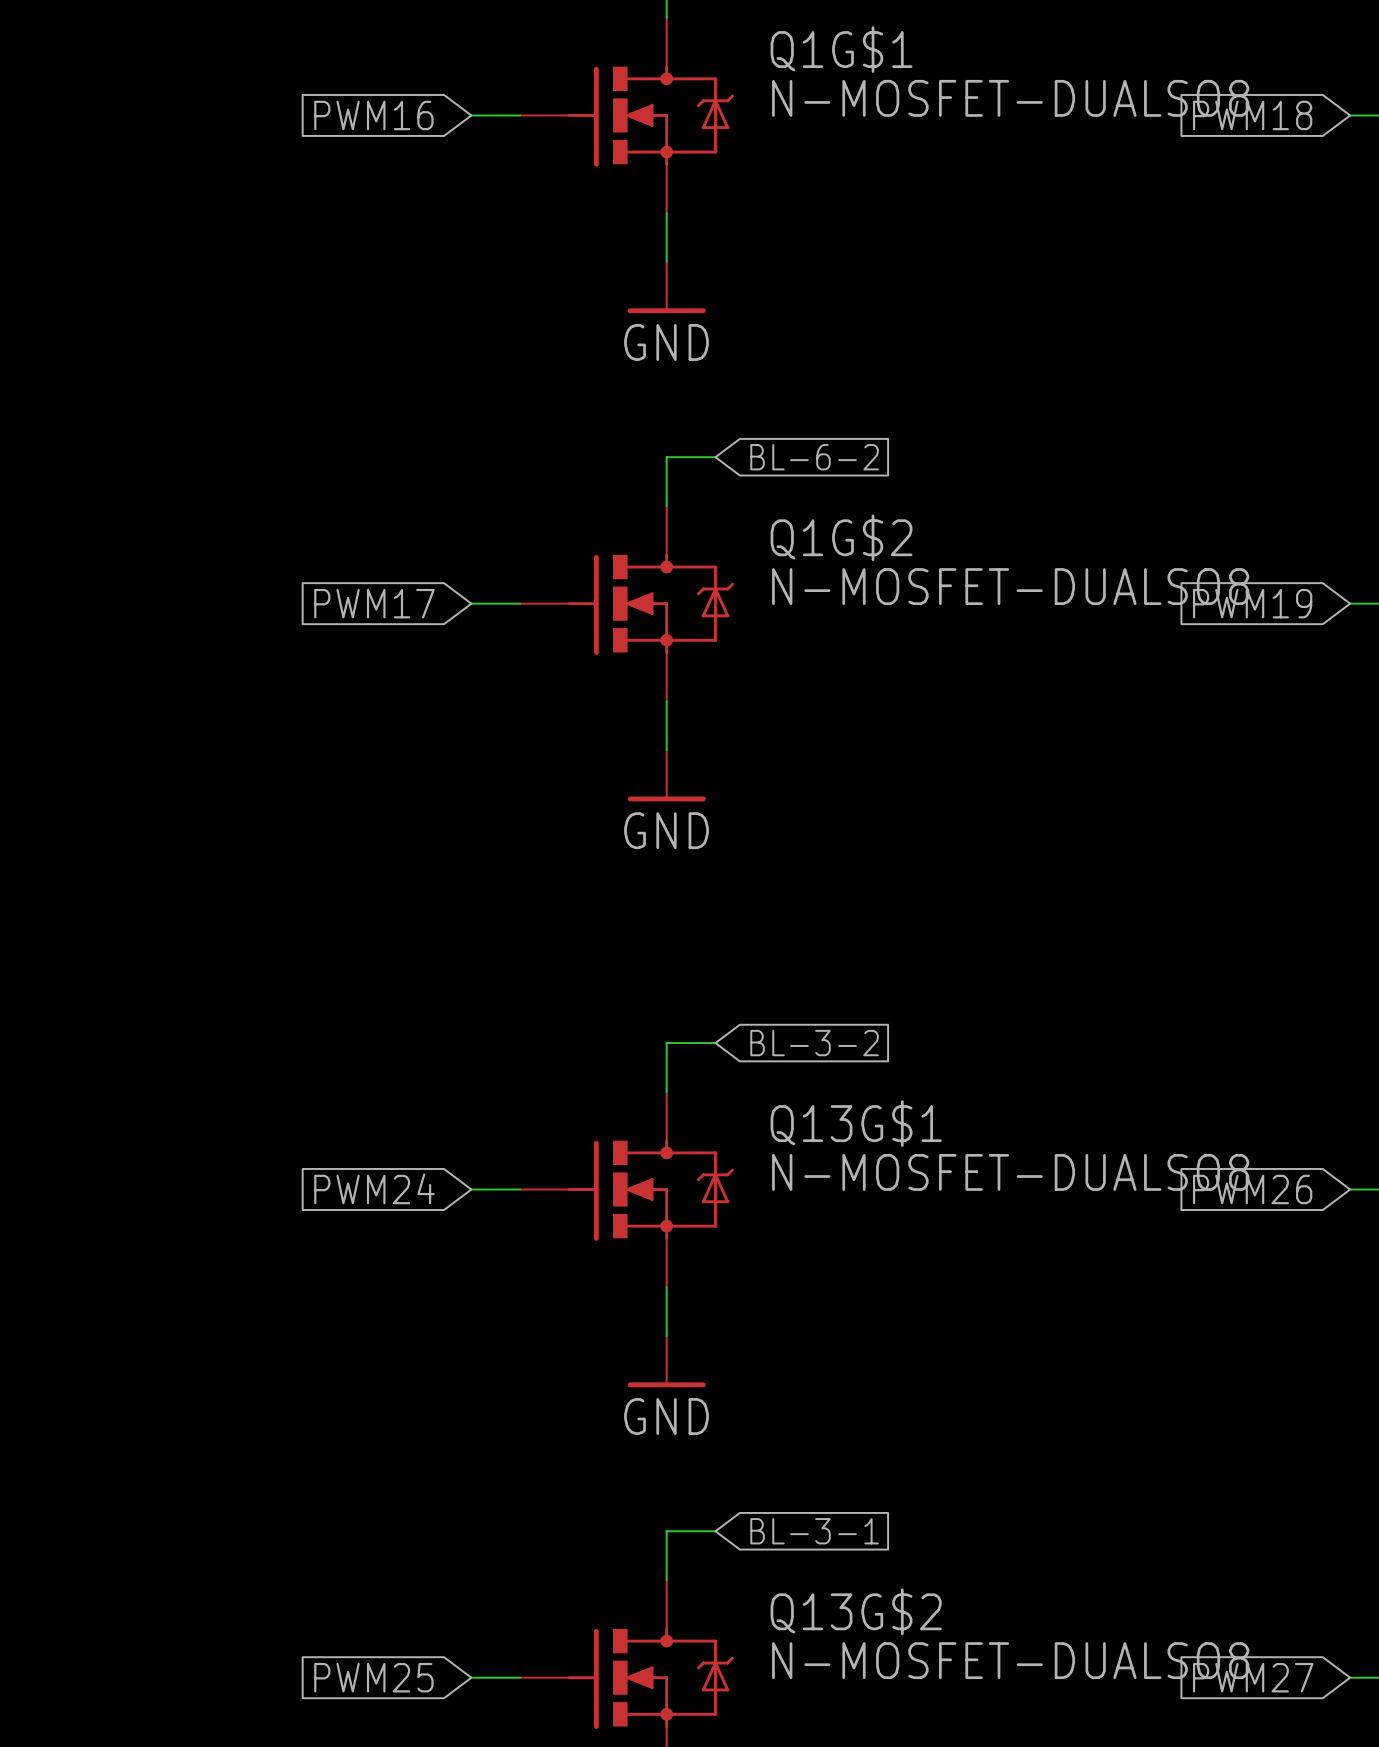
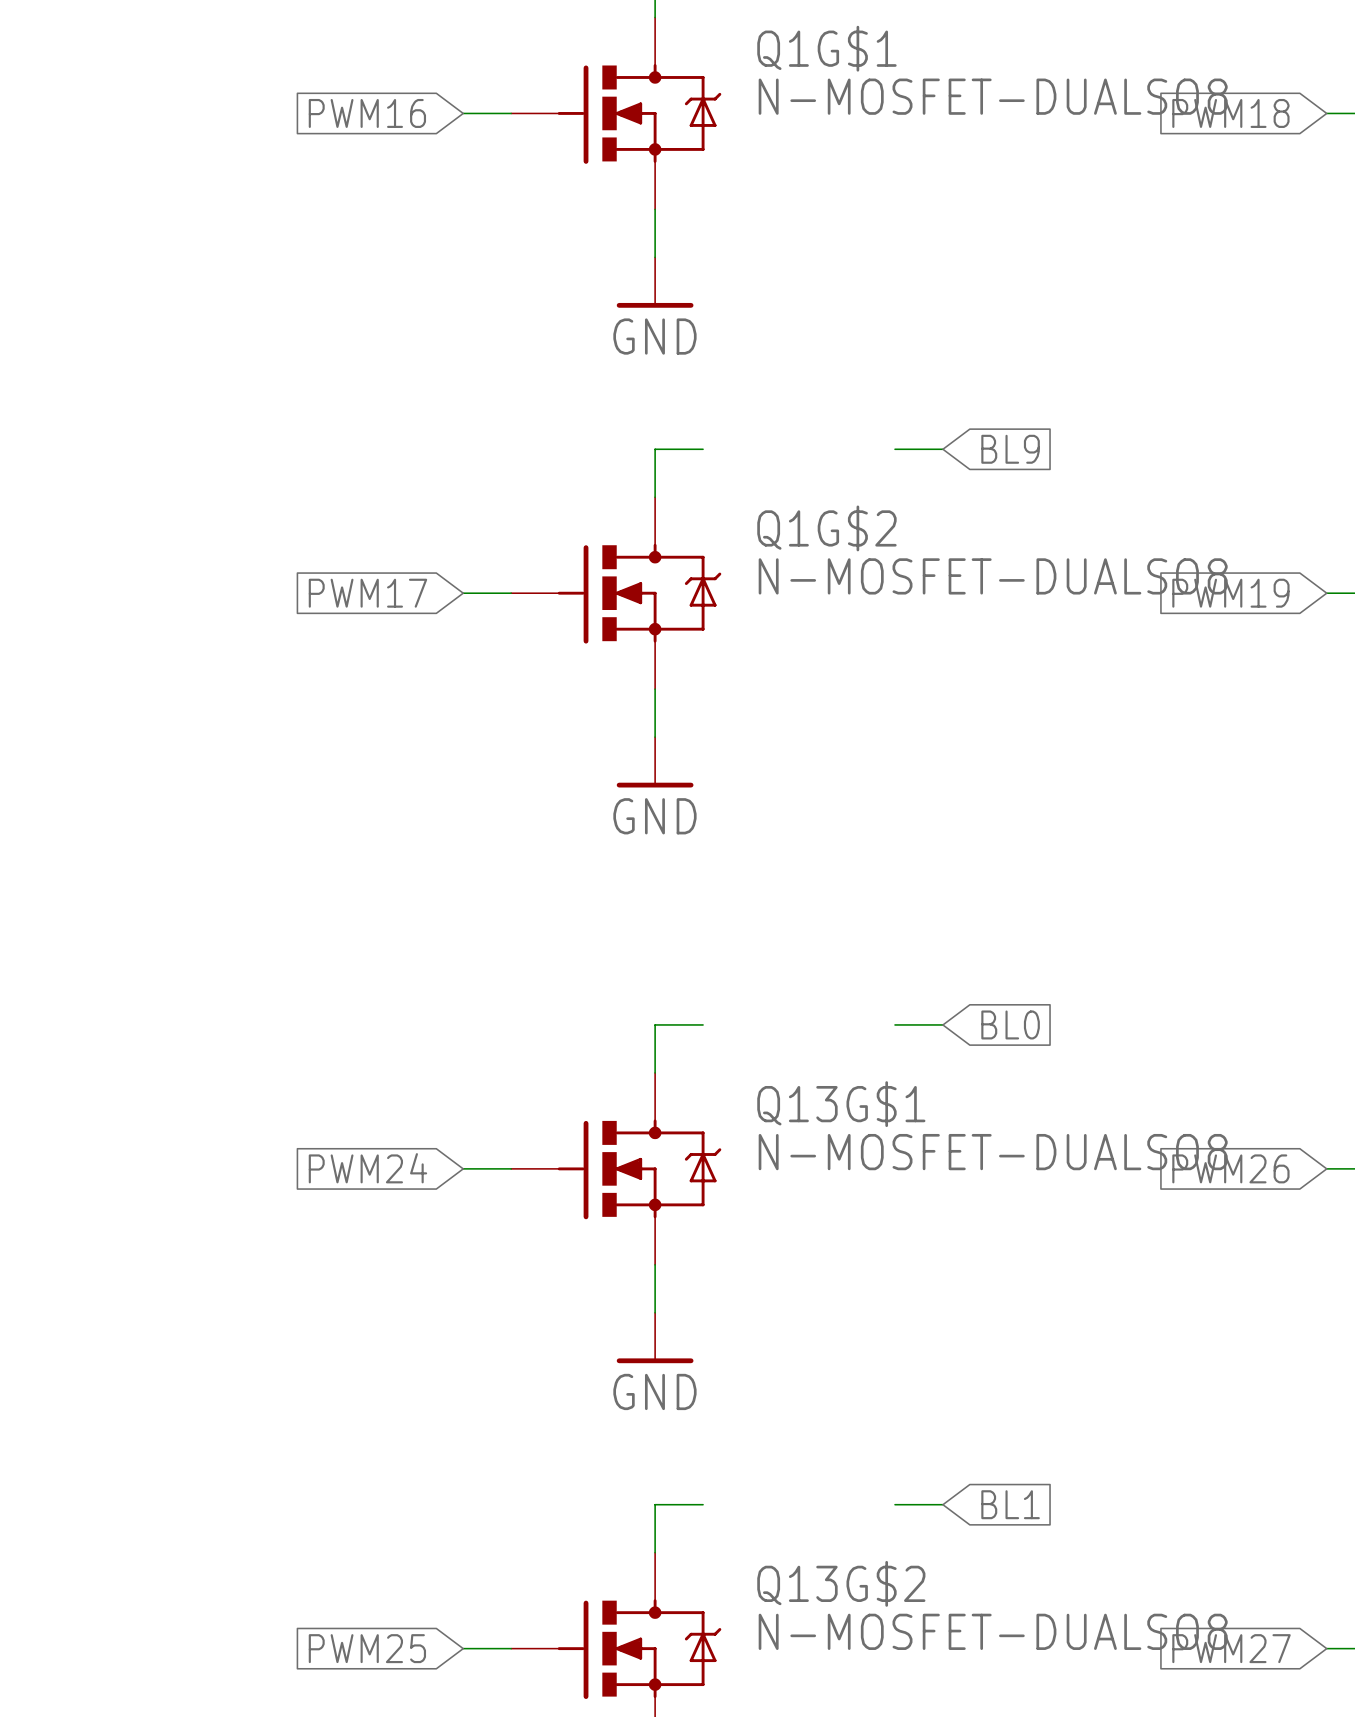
global label: BL-6-2 (814, 457) -> none
wire: none -> (894, 449) (942, 449)
global label: none -> BL9 (1010, 449)
global label: BL-3-2 (814, 1043) -> none
wire: none -> (894, 1024) (942, 1024)
global label: none -> BL0 (1010, 1024)
global label: BL-3-1 (814, 1531) -> none
wire: none -> (894, 1504) (942, 1504)
global label: none -> BL1 (1010, 1504)

